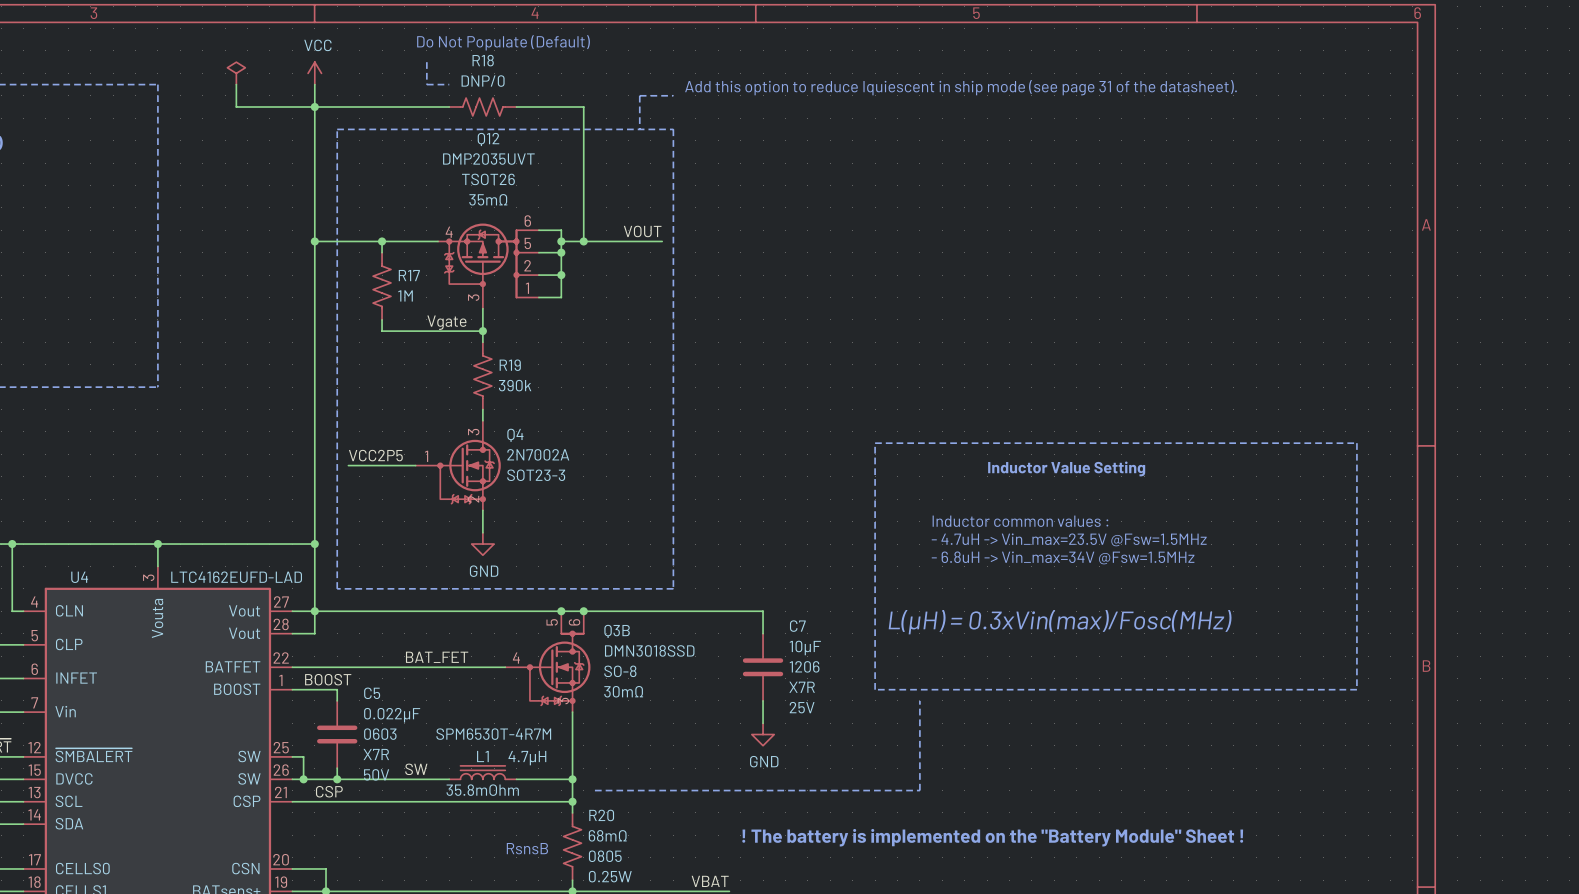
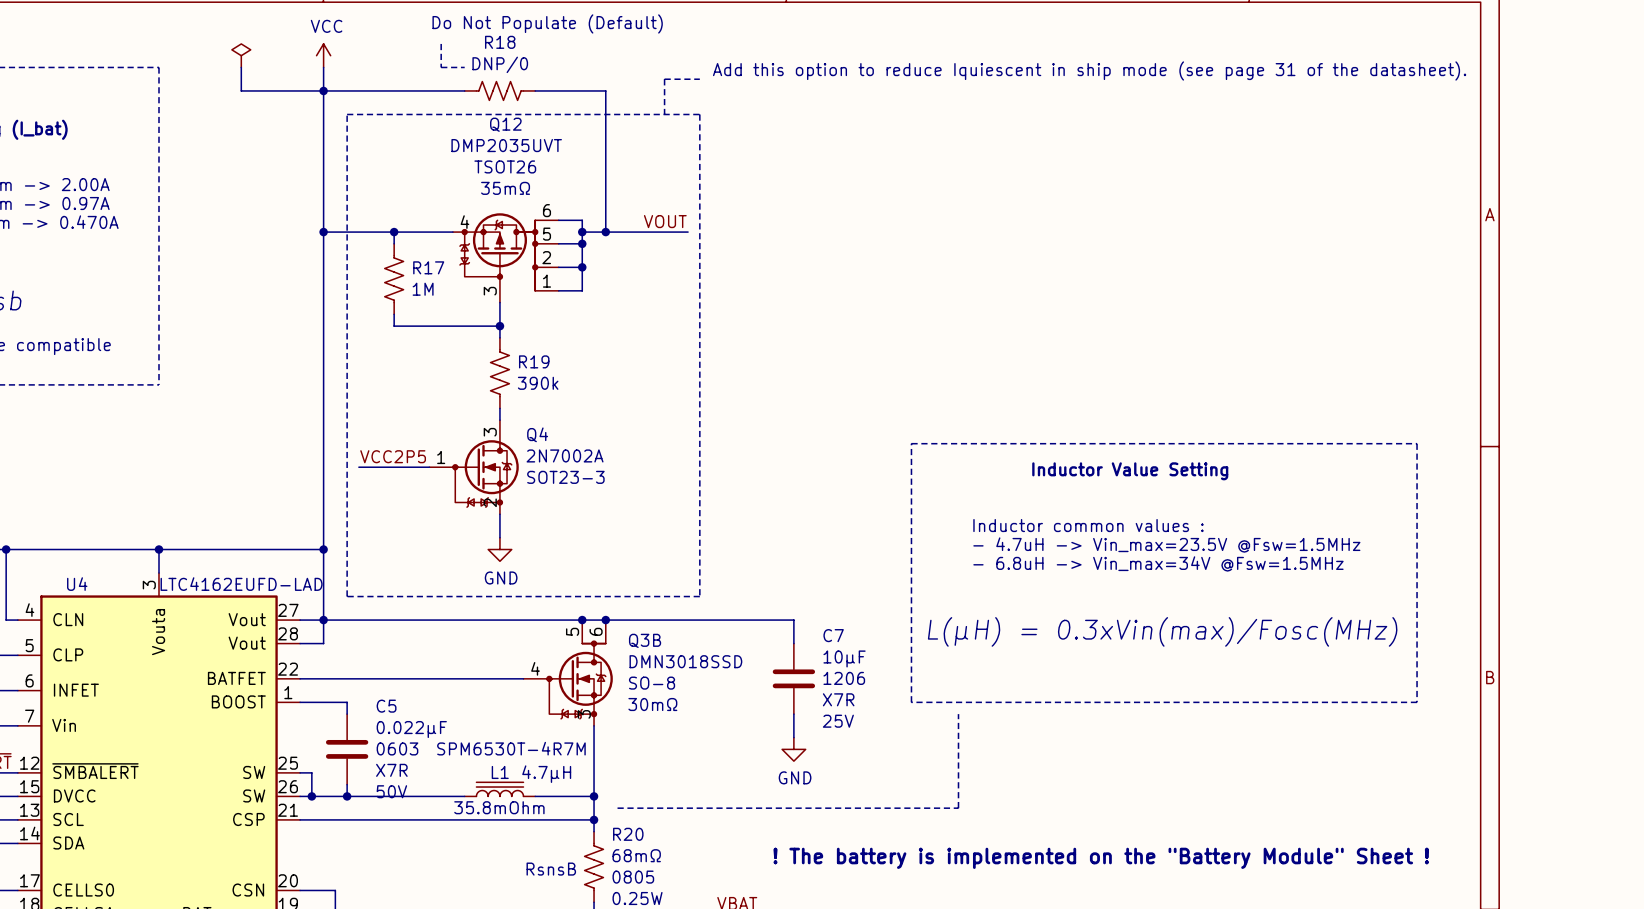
label: Vgate (446, 322) -> none
label: BAT_FET (437, 657) -> none
label: BOOST (328, 679) -> none
label: SW (416, 769) -> none
label: CSP (329, 791) -> none

